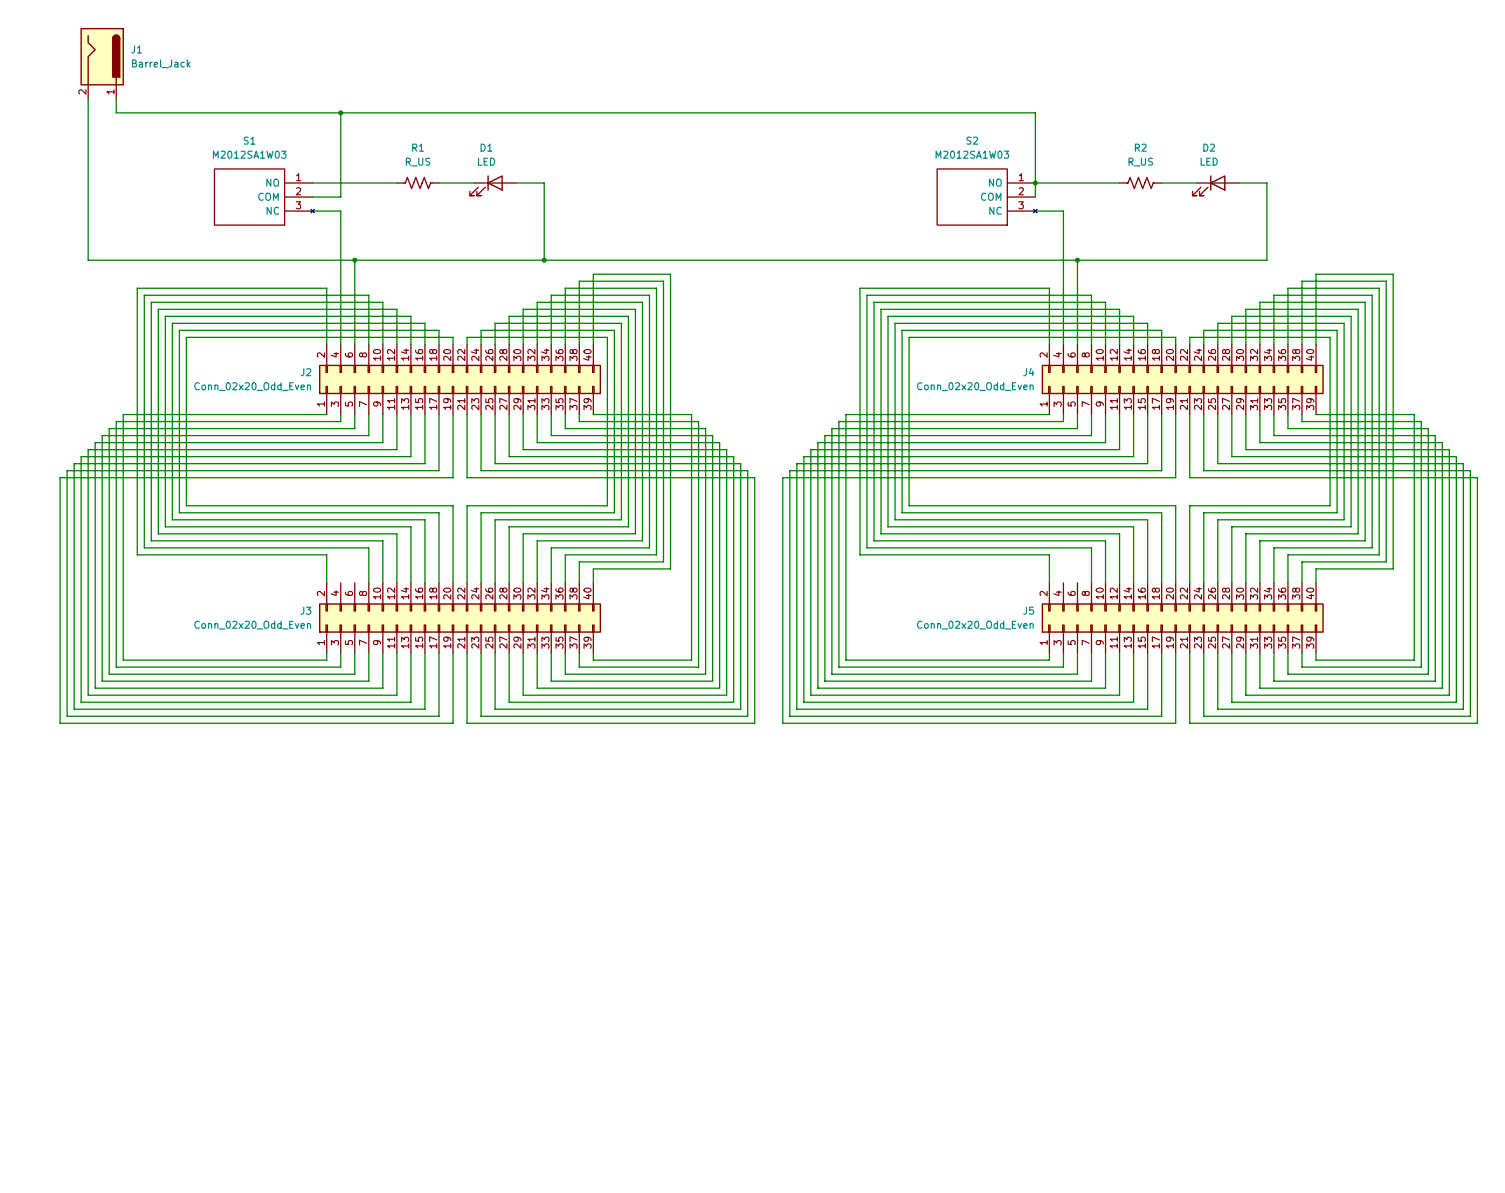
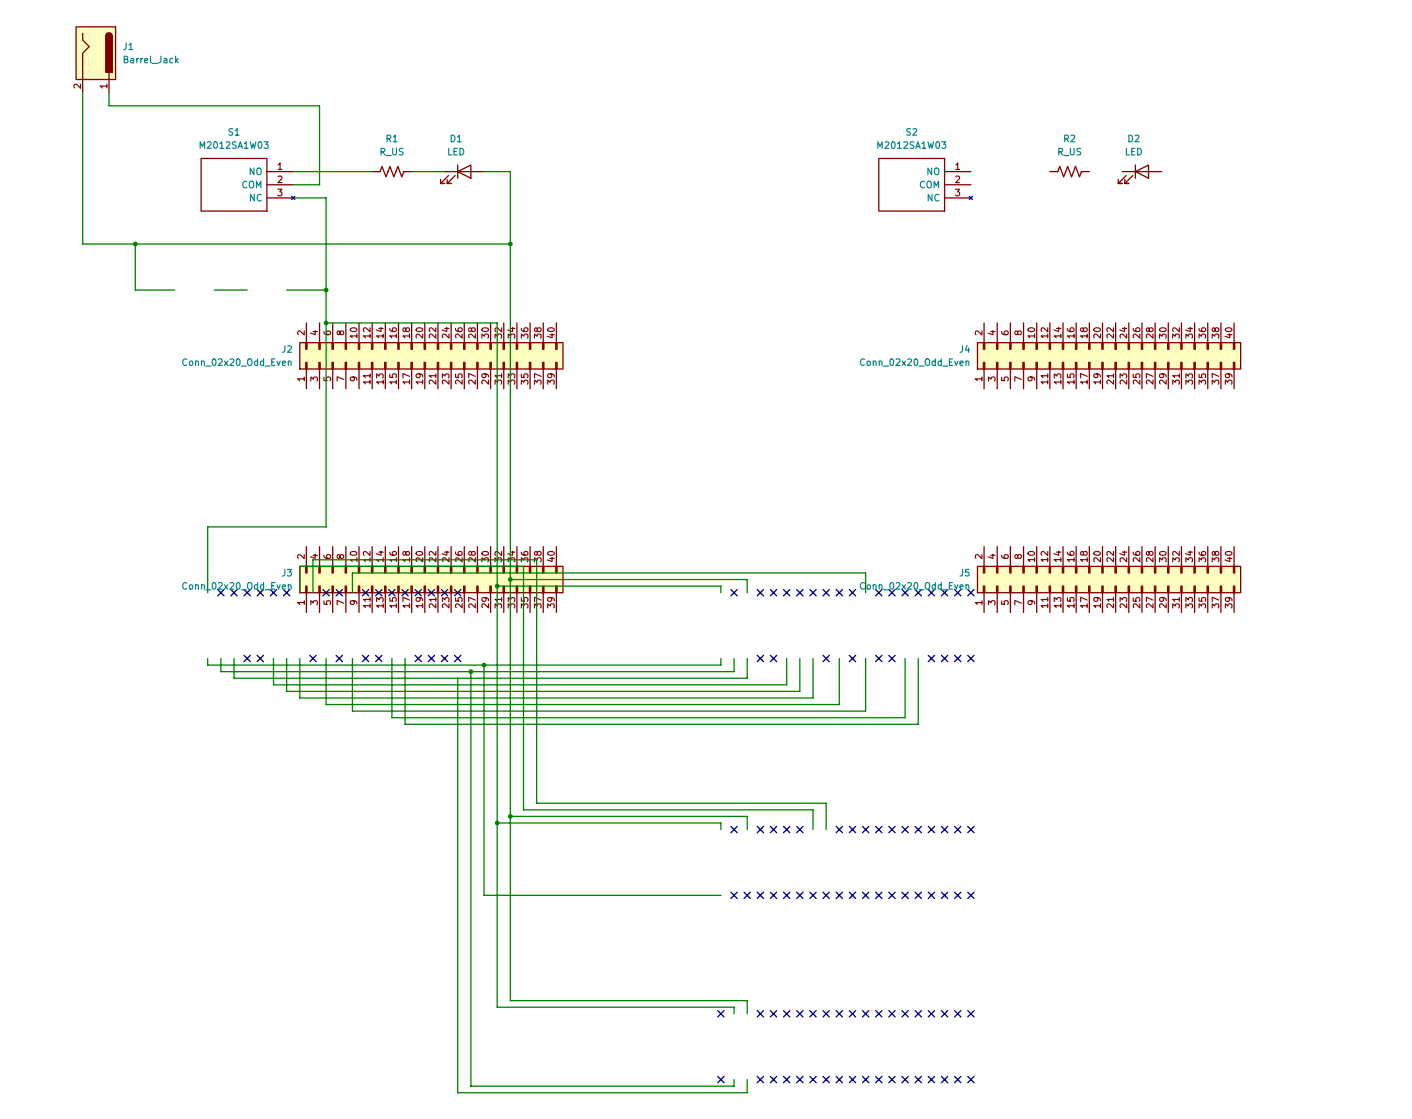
wire: (340, 112) (1035, 112) (1035, 197) -> none
junction: (340, 112) -> none
wire: (1035, 183) (1119, 183) -> none
junction: (1035, 183) -> none
wire: (1161, 183) (1196, 183) -> none
wire: (1238, 183) (1266, 183) (1266, 260) (544, 260) -> (747, 1013) (747, 1000) (510, 1000) (510, 243)
wire: (340, 211) (340, 344) -> (319, 197) (326, 197) (326, 526) (207, 526) (207, 592)
wire: (1035, 211) (1063, 211) (1063, 344) -> none
junction: none -> (135, 243)
wire: (354, 260) (354, 344) -> none
junction: (354, 260) -> none
wire: (1077, 260) (1077, 344) -> none
junction: (1077, 260) -> none
wire: (144, 295) (368, 295) (368, 344) -> (135, 276) (135, 243)
wire: (144, 309) (144, 547) (368, 547) (368, 582) -> (135, 290) (148, 290)
wire: (158, 309) (158, 533) (396, 533) (396, 582) -> none
wire: (186, 309) (228, 309) -> none
wire: (263, 309) (305, 309) -> none
wire: (347, 309) (396, 309) (396, 344) -> none
junction: none -> (326, 290)
wire: (326, 344) (326, 288) (137, 288) (137, 554) (326, 554) (326, 582) -> none
wire: none -> (326, 322) (497, 322) (497, 1007) (734, 1007) (734, 1013)
junction: none -> (326, 322)
wire: (382, 344) (382, 302) (151, 302) (151, 540) (382, 540) (382, 582) -> none
wire: (410, 344) (410, 316) (165, 316) (165, 526) (410, 526) (410, 582) -> none
wire: (424, 344) (424, 323) (172, 323) (172, 519) (424, 519) (424, 582) -> none
wire: (438, 344) (438, 330) (179, 330) (179, 512) (438, 512) (438, 582) -> none
wire: (453, 344) (453, 337) (186, 337) (186, 505) (453, 505) (453, 582) -> none
wire: (467, 344) (467, 337) (607, 337) (607, 505) (467, 505) (467, 582) -> none
wire: (481, 344) (481, 330) (614, 330) (614, 512) (481, 512) (481, 582) -> none
wire: (495, 344) (495, 323) (621, 323) (621, 519) (495, 519) (495, 582) -> none
wire: (509, 344) (509, 316) (628, 316) (628, 526) (509, 526) (509, 582) -> none
wire: (523, 344) (523, 309) (635, 309) (635, 533) (523, 533) (523, 582) -> none
wire: (537, 344) (537, 302) (642, 302) (642, 540) (537, 540) (537, 582) -> none
wire: (551, 344) (551, 295) (649, 295) (649, 547) (551, 547) (551, 582) -> none
wire: (565, 344) (565, 288) (656, 288) (656, 554) (565, 554) (565, 582) -> none
wire: (579, 344) (579, 281) (663, 281) (663, 561) (579, 561) (579, 582) -> none
wire: (593, 344) (593, 274) (670, 274) (670, 568) (593, 568) (593, 582) -> none
wire: (1049, 344) (1049, 288) (859, 288) (859, 554) (1049, 554) (1049, 582) -> none
wire: (1091, 344) (1091, 295) (866, 295) (866, 547) (1091, 547) (1091, 582) -> none
wire: (1105, 344) (1105, 302) (873, 302) (873, 540) (1105, 540) (1105, 582) -> none
wire: (1119, 344) (1119, 309) (881, 309) (881, 533) (1119, 533) (1119, 582) -> none
wire: (1133, 344) (1133, 316) (888, 316) (888, 526) (1133, 526) (1133, 582) -> none
wire: (1147, 344) (1147, 323) (895, 323) (895, 519) (1147, 519) (1147, 582) -> none
wire: (1161, 344) (1161, 330) (902, 330) (902, 512) (1161, 512) (1161, 582) -> none
wire: (1175, 344) (1175, 337) (909, 337) (909, 505) (1175, 505) (1175, 582) -> none
wire: (1189, 344) (1189, 337) (1330, 337) (1330, 505) (1189, 505) (1189, 582) -> none
wire: (1203, 344) (1203, 330) (1337, 330) (1337, 512) (1203, 512) (1203, 582) -> none
wire: (1217, 344) (1217, 323) (1344, 323) (1344, 519) (1217, 519) (1217, 582) -> none
wire: (1231, 344) (1231, 316) (1351, 316) (1351, 526) (1231, 526) (1231, 582) -> none
wire: (1245, 344) (1245, 309) (1358, 309) (1358, 533) (1245, 533) (1245, 582) -> none
wire: (1259, 344) (1259, 302) (1365, 302) (1365, 540) (1259, 540) (1259, 582) -> none
wire: (1273, 344) (1273, 295) (1372, 295) (1372, 547) (1273, 547) (1273, 582) -> none
wire: (1287, 344) (1287, 288) (1379, 288) (1379, 554) (1287, 554) (1287, 582) -> none
wire: (1301, 344) (1301, 281) (1386, 281) (1386, 561) (1301, 561) (1301, 582) -> none
wire: (1316, 344) (1316, 274) (1393, 274) (1393, 568) (1316, 568) (1316, 582) -> none
wire: (326, 414) (123, 414) (123, 660) (326, 660) (326, 653) -> none
wire: (340, 414) (340, 421) (116, 421) (116, 667) (340, 667) (340, 653) -> none
wire: (354, 414) (354, 428) (109, 428) (109, 674) (354, 674) (354, 653) -> none
wire: (368, 414) (368, 435) (102, 435) (102, 681) (368, 681) (368, 653) -> none
wire: (382, 414) (382, 442) (95, 442) (95, 688) (382, 688) (382, 653) -> none
wire: (396, 414) (396, 449) (88, 449) (88, 695) (396, 695) (396, 653) -> none
wire: (410, 414) (410, 456) (81, 456) (81, 702) (410, 702) (410, 653) -> none
wire: (424, 414) (424, 463) (74, 463) (74, 709) (221, 709) -> (207, 658) (207, 665)
wire: (438, 414) (438, 470) (67, 470) (67, 716) (235, 716) -> (220, 658) (220, 671)
wire: (453, 414) (453, 477) (60, 477) (60, 723) (249, 723) -> (234, 658) (234, 678)
wire: (467, 414) (467, 477) (754, 477) (754, 723) -> none
wire: (481, 414) (481, 470) (747, 470) (747, 716) -> (734, 671) (701, 671)
wire: (495, 414) (495, 463) (740, 463) (740, 709) -> (720, 658) (720, 665) (694, 665)
wire: (509, 414) (509, 456) (733, 456) (733, 702) (509, 702) (509, 653) -> none
wire: (523, 414) (523, 449) (726, 449) (726, 695) (523, 695) (523, 653) -> none
wire: (537, 414) (537, 442) (719, 442) (719, 688) (537, 688) (537, 653) -> none
wire: (551, 414) (551, 435) (712, 435) (712, 681) (551, 681) (551, 653) -> none
wire: (565, 414) (565, 428) (705, 428) (705, 674) (565, 674) (565, 653) -> none
wire: (579, 414) (579, 421) (698, 421) (698, 667) (579, 667) (579, 653) -> none
wire: (593, 414) (691, 414) (691, 660) (593, 660) (593, 653) -> none
wire: (1049, 414) (845, 414) (845, 660) (1049, 660) (1049, 653) -> none
wire: (1063, 414) (1063, 421) (838, 421) (838, 667) (1063, 667) (1063, 653) -> none
wire: (1077, 414) (1077, 428) (831, 428) (831, 674) (1077, 674) (1077, 653) -> none
wire: (1091, 414) (1091, 435) (824, 435) (824, 681) (1091, 681) (1091, 653) -> none
wire: (1105, 414) (1105, 442) (817, 442) (817, 688) (1105, 688) (1105, 653) -> none
wire: (1119, 414) (1119, 449) (810, 449) (810, 695) (1119, 695) (1119, 653) -> none
wire: (1133, 414) (1133, 456) (803, 456) (803, 702) (1133, 702) (1133, 653) -> none
wire: (1147, 414) (1147, 463) (796, 463) (796, 618) -> (510, 579) (747, 579)
wire: (1161, 414) (1161, 470) (789, 470) (789, 716) (1161, 716) (1161, 653) -> none
wire: (1175, 414) (1175, 477) (782, 477) (782, 702) -> none
wire: (1189, 414) (1189, 477) (1477, 477) (1477, 723) (1189, 723) (1189, 653) -> none
wire: (1203, 414) (1203, 470) (1470, 470) (1470, 716) (1203, 716) (1203, 653) -> none
wire: (1217, 414) (1217, 463) (1463, 463) (1463, 709) (1217, 709) (1217, 653) -> none
wire: (1231, 414) (1231, 456) (1456, 456) (1456, 702) (1231, 702) (1231, 653) -> none
wire: (1245, 414) (1245, 449) (1449, 449) (1449, 695) (1245, 695) (1245, 653) -> none
wire: (1259, 414) (1259, 442) (1442, 442) (1442, 688) (1259, 688) (1259, 653) -> none
wire: (1273, 414) (1273, 435) (1435, 435) (1435, 681) (1273, 681) (1273, 653) -> none
wire: (1287, 414) (1287, 428) (1428, 428) (1428, 674) (1287, 674) (1287, 653) -> none
wire: (1301, 414) (1301, 421) (1421, 421) (1421, 667) (1301, 667) (1301, 653) -> none
wire: (1316, 414) (1414, 414) (1414, 660) (1316, 660) (1316, 653) -> none
junction: none -> (510, 579)
wire: none -> (497, 586) (720, 586) (720, 592)
junction: none -> (497, 586)
no-connect mark: none -> (220, 592)
no-connect mark: none -> (234, 592)
no-connect mark: none -> (247, 592)
no-connect mark: none -> (260, 592)
no-connect mark: none -> (273, 592)
no-connect mark: none -> (286, 592)
wire: none -> (299, 592) (299, 566) (523, 566) (523, 809) (812, 809) (812, 829)
wire: none -> (312, 592) (312, 559) (536, 559) (536, 803) (826, 803) (826, 829)
no-connect mark: none -> (326, 592)
no-connect mark: none -> (339, 592)
wire: none -> (352, 592) (352, 572) (865, 572) (865, 592)
no-connect mark: none -> (365, 592)
no-connect mark: none -> (378, 592)
no-connect mark: none -> (391, 592)
no-connect mark: none -> (405, 592)
no-connect mark: none -> (418, 592)
no-connect mark: none -> (431, 592)
no-connect mark: none -> (444, 592)
no-connect mark: none -> (457, 592)
no-connect mark: none -> (734, 592)
wire: (796, 632) (796, 702) -> none
no-connect mark: none -> (760, 592)
no-connect mark: none -> (773, 592)
no-connect mark: none -> (786, 592)
no-connect mark: none -> (799, 592)
no-connect mark: none -> (812, 592)
no-connect mark: none -> (826, 592)
no-connect mark: none -> (839, 592)
no-connect mark: none -> (852, 592)
no-connect mark: none -> (878, 592)
no-connect mark: none -> (891, 592)
no-connect mark: none -> (905, 592)
no-connect mark: none -> (918, 592)
no-connect mark: none -> (931, 592)
no-connect mark: none -> (944, 592)
no-connect mark: none -> (957, 592)
no-connect mark: none -> (970, 592)
wire: (424, 653) (424, 709) -> (464, 665) (398, 665)
wire: (438, 653) (438, 716) -> (451, 671) (411, 671)
wire: (453, 653) (453, 723) -> (437, 678) (424, 678)
wire: (467, 653) (467, 723) -> none
wire: (481, 653) (481, 716) -> none
wire: (495, 653) (495, 709) -> none
wire: (1147, 653) (1147, 709) (796, 709) -> (747, 678) (747, 665)
wire: (1175, 653) (1175, 723) (796, 723) -> none
no-connect mark: none -> (247, 658)
no-connect mark: none -> (260, 658)
wire: none -> (273, 658) (273, 684) (786, 684) (786, 658)
wire: none -> (286, 658) (286, 691) (799, 691) (799, 658)
wire: none -> (299, 658) (299, 697) (812, 697) (812, 658)
no-connect mark: none -> (312, 658)
wire: none -> (326, 658) (326, 704) (839, 704) (839, 658)
no-connect mark: none -> (339, 658)
wire: none -> (352, 658) (352, 711) (865, 711) (865, 658)
no-connect mark: none -> (365, 658)
no-connect mark: none -> (378, 658)
wire: none -> (391, 658) (391, 717) (905, 717) (905, 658)
wire: none -> (405, 658) (405, 724) (918, 724) (918, 658)
no-connect mark: none -> (418, 658)
no-connect mark: none -> (431, 658)
no-connect mark: none -> (444, 658)
no-connect mark: none -> (457, 658)
no-connect mark: none -> (760, 658)
no-connect mark: none -> (773, 658)
no-connect mark: none -> (826, 658)
no-connect mark: none -> (852, 658)
no-connect mark: none -> (878, 658)
no-connect mark: none -> (891, 658)
no-connect mark: none -> (931, 658)
no-connect mark: none -> (944, 658)
no-connect mark: none -> (957, 658)
no-connect mark: none -> (970, 658)
wire: none -> (484, 665) (484, 895) (720, 895)
junction: none -> (484, 665)
wire: none -> (470, 671) (470, 1086) (734, 1086) (734, 1079)
junction: none -> (470, 671)
wire: (782, 716) (782, 723) -> (707, 678) (734, 678)
wire: none -> (457, 678) (457, 1092) (747, 1092) (747, 1079)
wire: none -> (510, 816) (747, 816) (747, 829)
junction: none -> (510, 816)
wire: none -> (497, 822) (720, 822) (720, 829)
junction: none -> (497, 822)
no-connect mark: none -> (734, 829)
no-connect mark: none -> (760, 829)
no-connect mark: none -> (773, 829)
no-connect mark: none -> (786, 829)
no-connect mark: none -> (799, 829)
no-connect mark: none -> (839, 829)
no-connect mark: none -> (852, 829)
no-connect mark: none -> (865, 829)
no-connect mark: none -> (878, 829)
no-connect mark: none -> (891, 829)
no-connect mark: none -> (905, 829)
no-connect mark: none -> (918, 829)
no-connect mark: none -> (931, 829)
no-connect mark: none -> (944, 829)
no-connect mark: none -> (957, 829)
no-connect mark: none -> (970, 829)
no-connect mark: none -> (734, 895)
no-connect mark: none -> (747, 895)
no-connect mark: none -> (760, 895)
no-connect mark: none -> (773, 895)
no-connect mark: none -> (786, 895)
no-connect mark: none -> (799, 895)
no-connect mark: none -> (812, 895)
no-connect mark: none -> (826, 895)
no-connect mark: none -> (839, 895)
no-connect mark: none -> (852, 895)
no-connect mark: none -> (865, 895)
no-connect mark: none -> (878, 895)
no-connect mark: none -> (891, 895)
no-connect mark: none -> (905, 895)
no-connect mark: none -> (918, 895)
no-connect mark: none -> (931, 895)
no-connect mark: none -> (944, 895)
no-connect mark: none -> (957, 895)
no-connect mark: none -> (970, 895)
no-connect mark: none -> (720, 1013)
no-connect mark: none -> (760, 1013)
no-connect mark: none -> (773, 1013)
no-connect mark: none -> (786, 1013)
no-connect mark: none -> (799, 1013)
no-connect mark: none -> (812, 1013)
no-connect mark: none -> (826, 1013)
no-connect mark: none -> (839, 1013)
no-connect mark: none -> (852, 1013)
no-connect mark: none -> (865, 1013)
no-connect mark: none -> (878, 1013)
no-connect mark: none -> (891, 1013)
no-connect mark: none -> (905, 1013)
no-connect mark: none -> (918, 1013)
no-connect mark: none -> (931, 1013)
no-connect mark: none -> (944, 1013)
no-connect mark: none -> (957, 1013)
no-connect mark: none -> (970, 1013)
no-connect mark: none -> (720, 1079)
no-connect mark: none -> (760, 1079)
no-connect mark: none -> (773, 1079)
no-connect mark: none -> (786, 1079)
no-connect mark: none -> (799, 1079)
no-connect mark: none -> (812, 1079)
no-connect mark: none -> (826, 1079)
no-connect mark: none -> (839, 1079)
no-connect mark: none -> (852, 1079)
no-connect mark: none -> (865, 1079)
no-connect mark: none -> (878, 1079)
no-connect mark: none -> (891, 1079)
no-connect mark: none -> (905, 1079)
no-connect mark: none -> (918, 1079)
no-connect mark: none -> (931, 1079)
no-connect mark: none -> (944, 1079)
no-connect mark: none -> (957, 1079)
no-connect mark: none -> (970, 1079)

